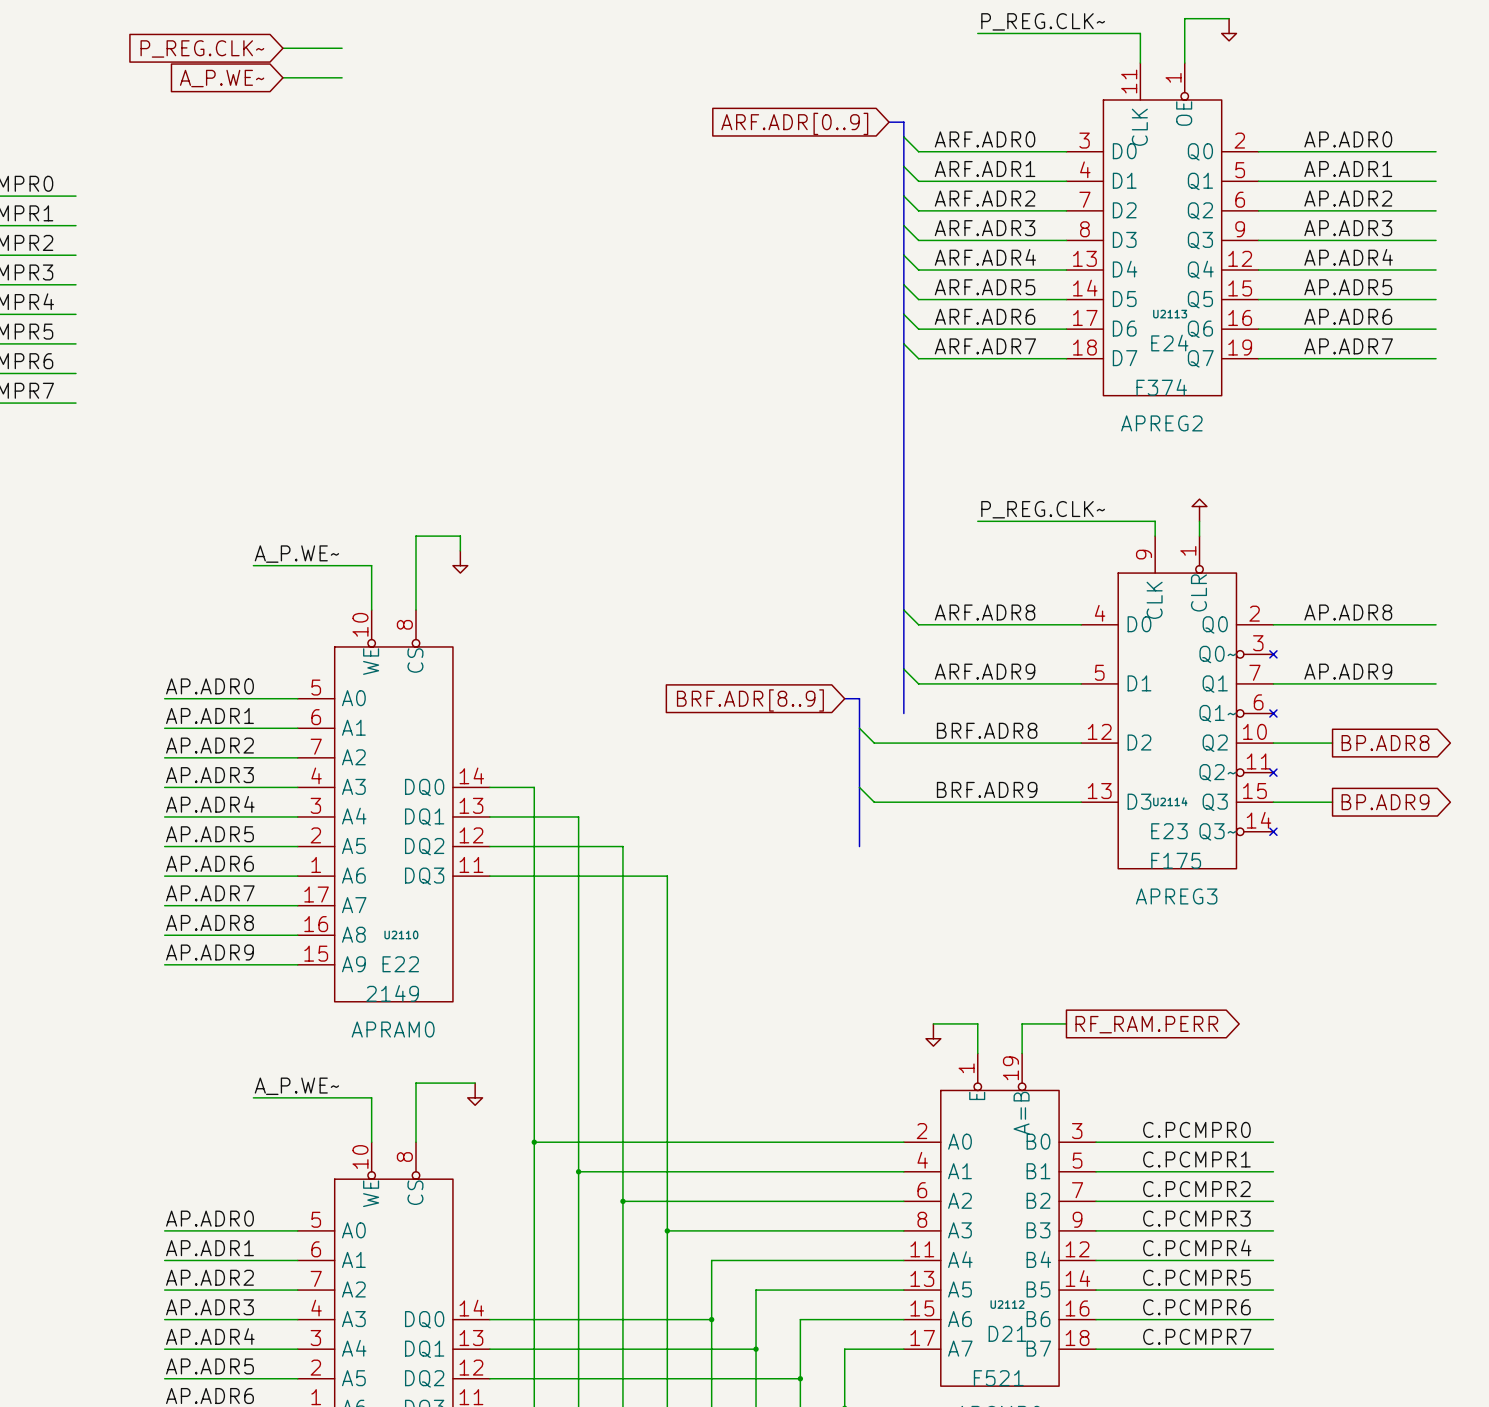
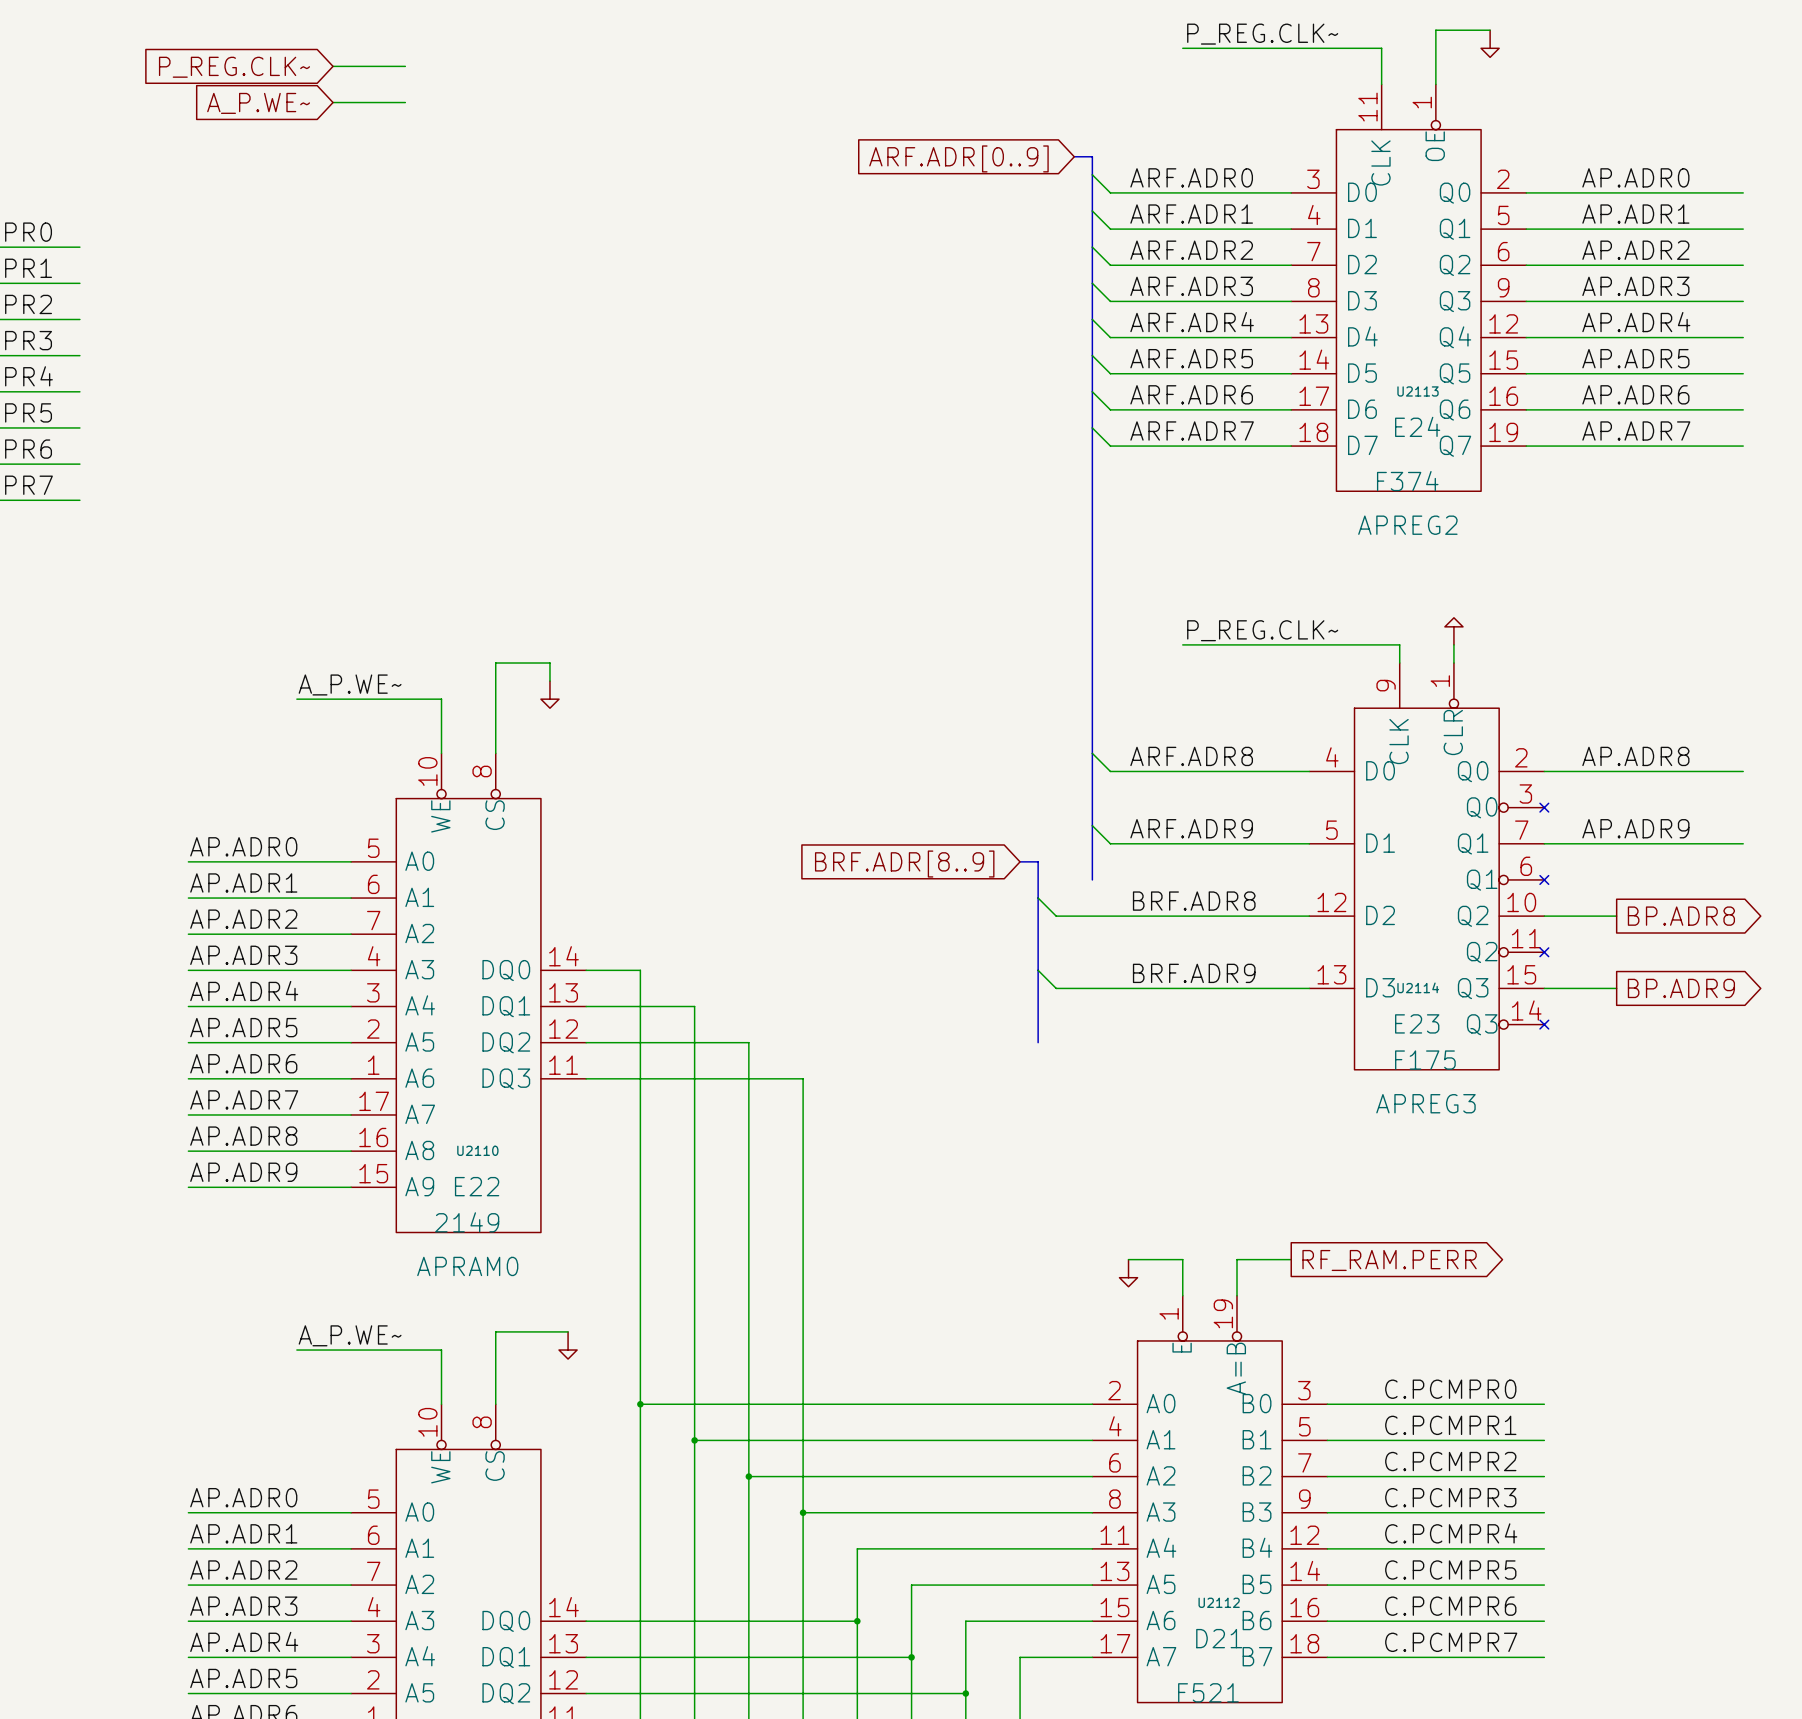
U2114 pin name: Q0~ (1217, 654) -> Q0 (1482, 807)
U2114 pin name: Q1~ (1217, 713) -> Q1 (1482, 880)
U2114 pin name: Q2~ (1217, 772) -> Q2 (1482, 952)
U2114 pin name: Q3~ (1217, 831) -> Q3 (1482, 1024)

